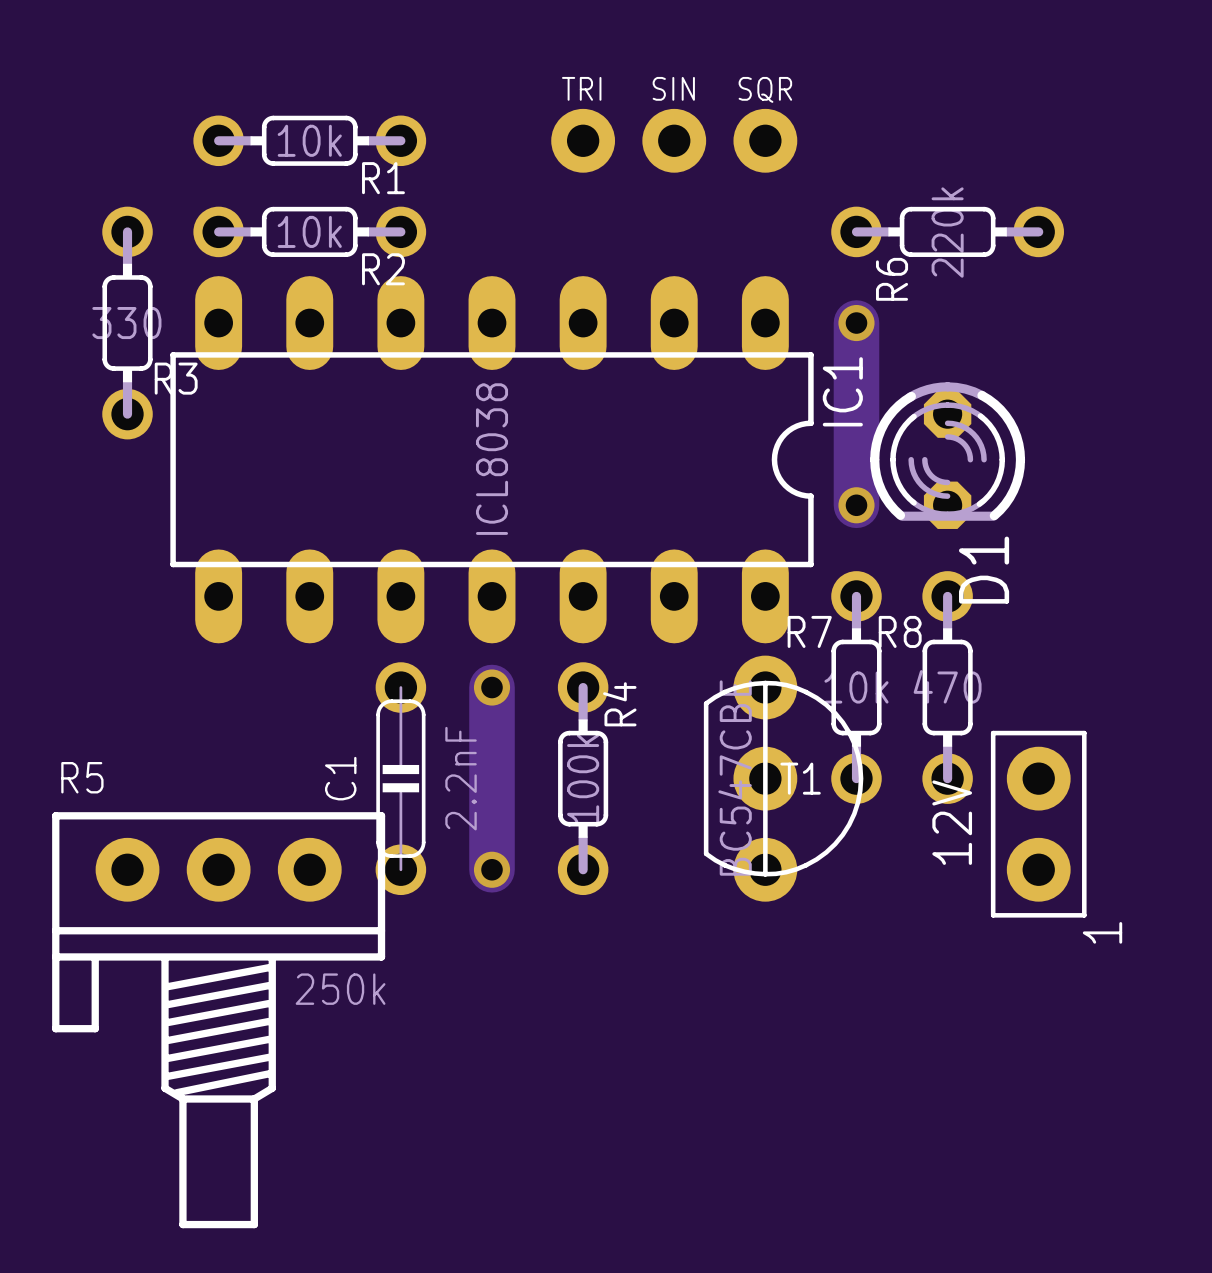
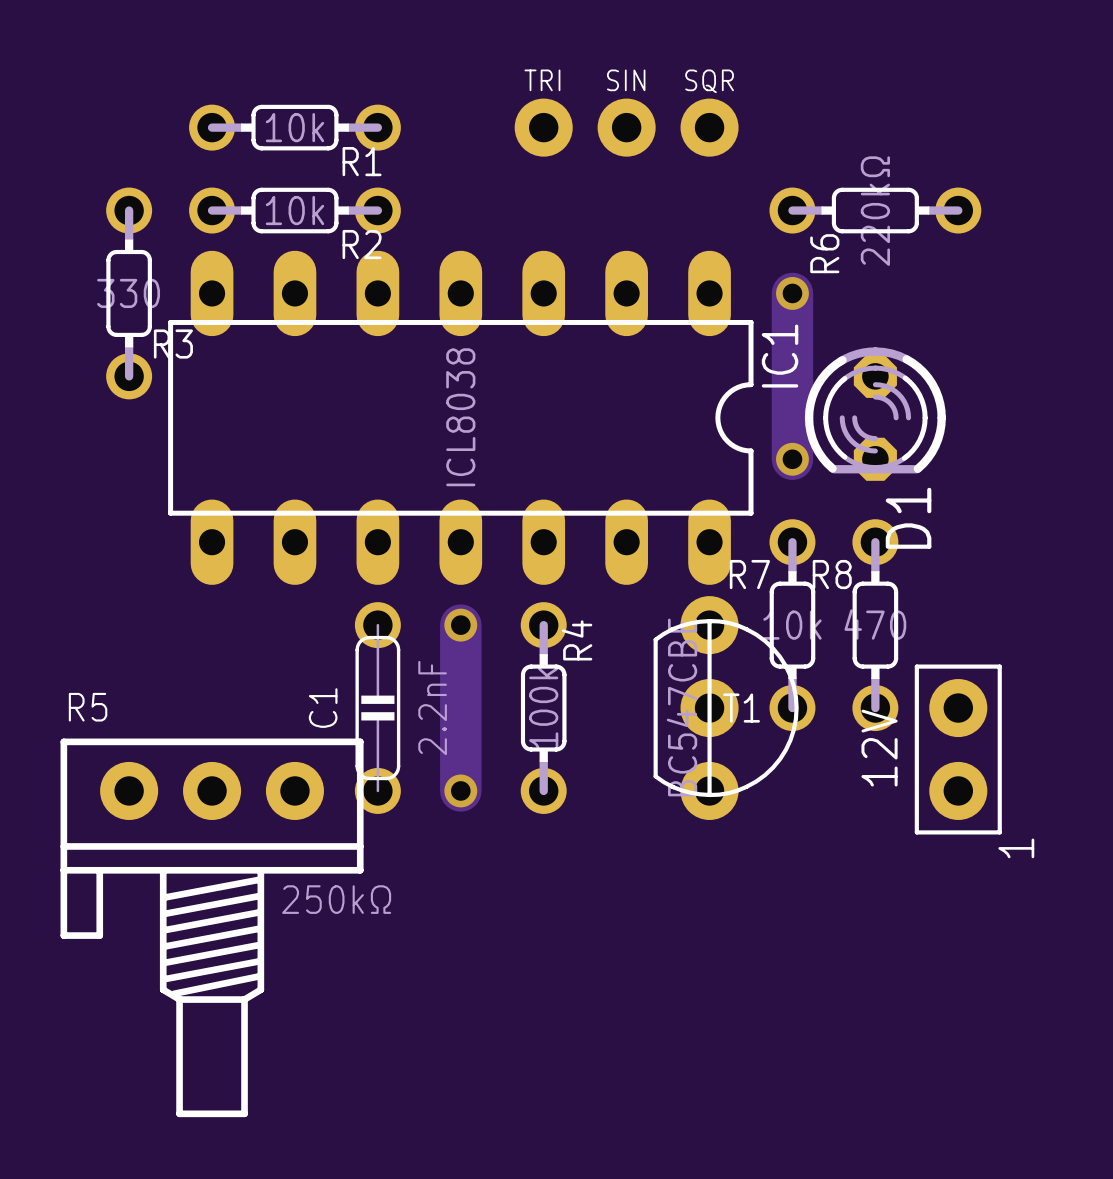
R6 value: 220k (947, 232) -> 220kΩ (875, 211)
R5 value: 250k (340, 989) -> 250kΩ (336, 899)

